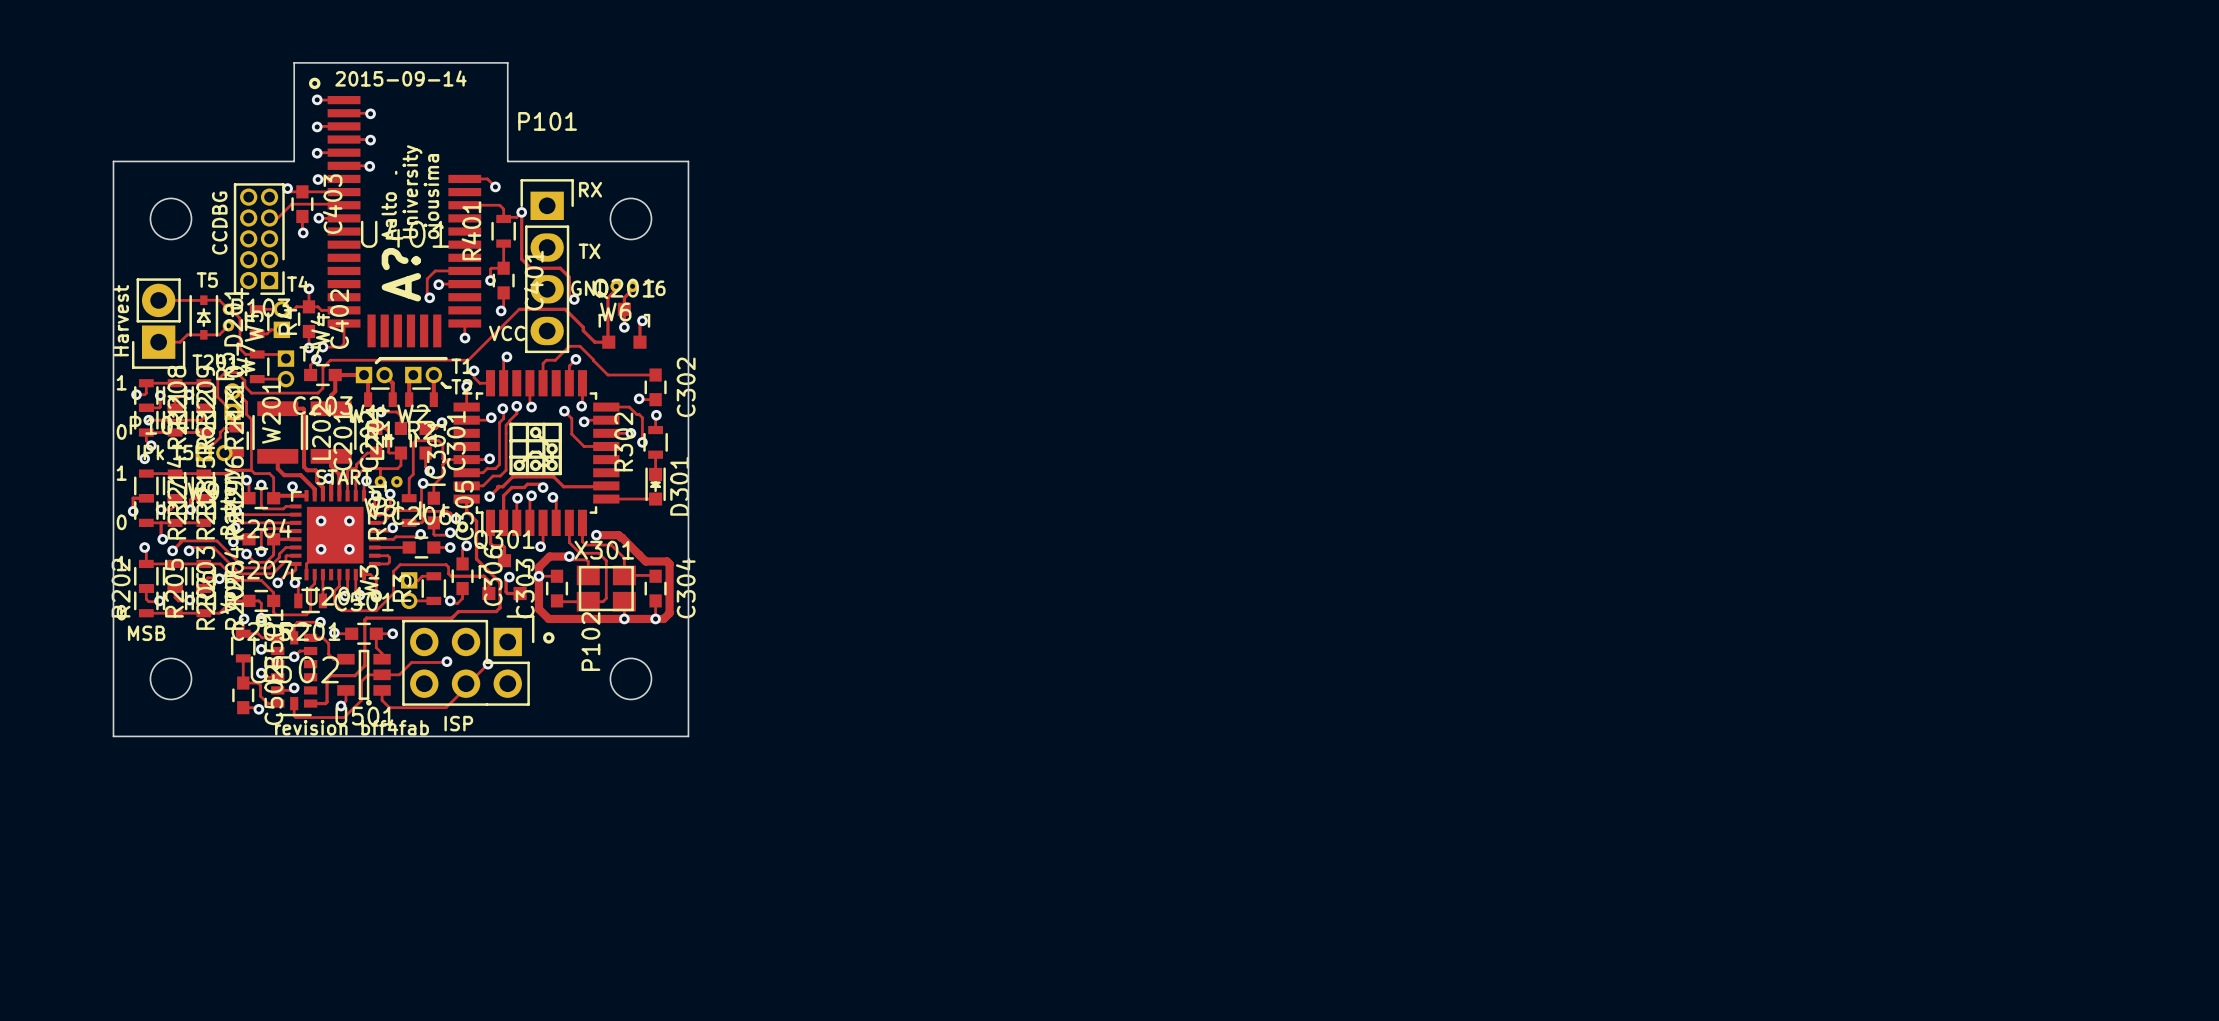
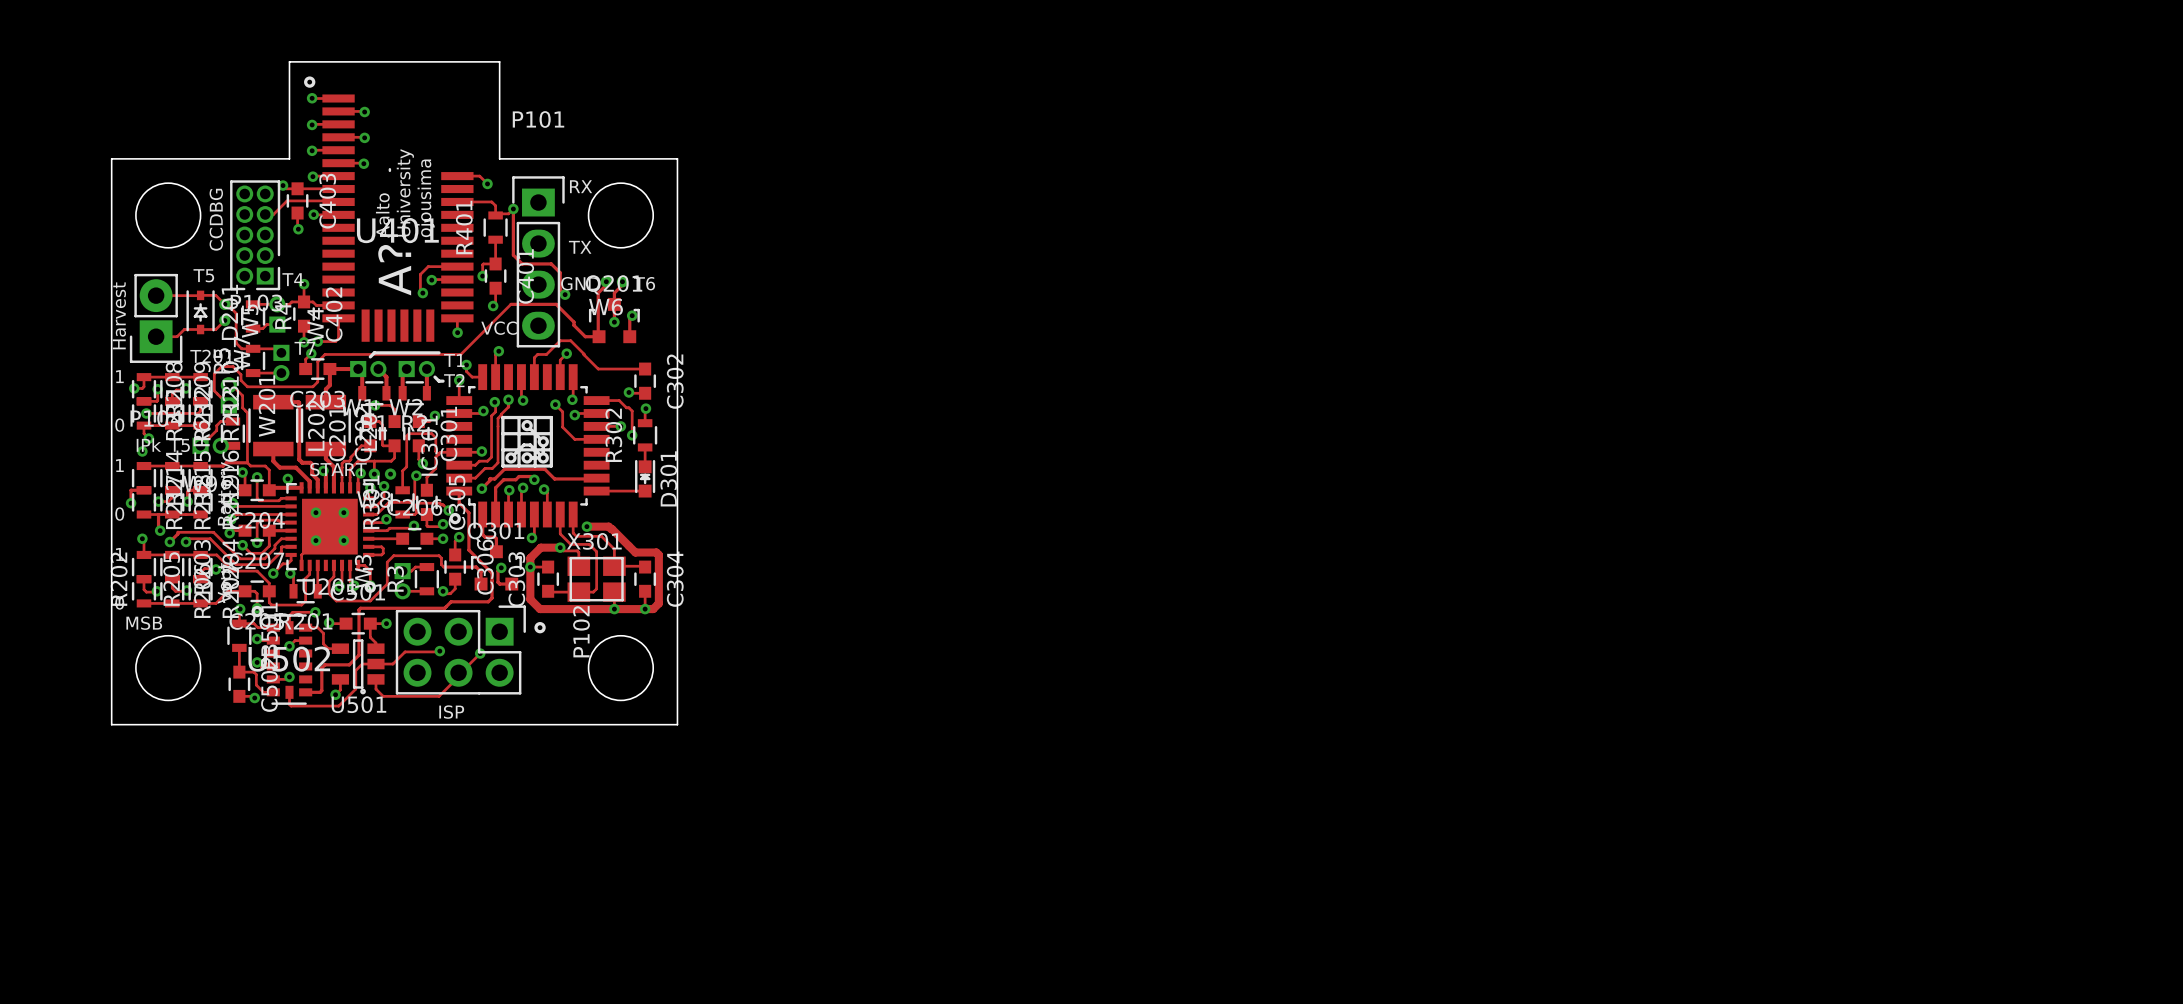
text: 2015-09-14 (400, 78) -> none
round board edge size: [149, 197, 193, 241] -> [135, 182, 202, 249]
round board edge size: [609, 197, 653, 241] -> [587, 182, 655, 249]
round board edge size: [149, 657, 193, 701] -> [135, 634, 202, 702]
round board edge size: [609, 657, 653, 701] -> [587, 634, 655, 702]
text: revision bff4fab (352, 727) -> none

